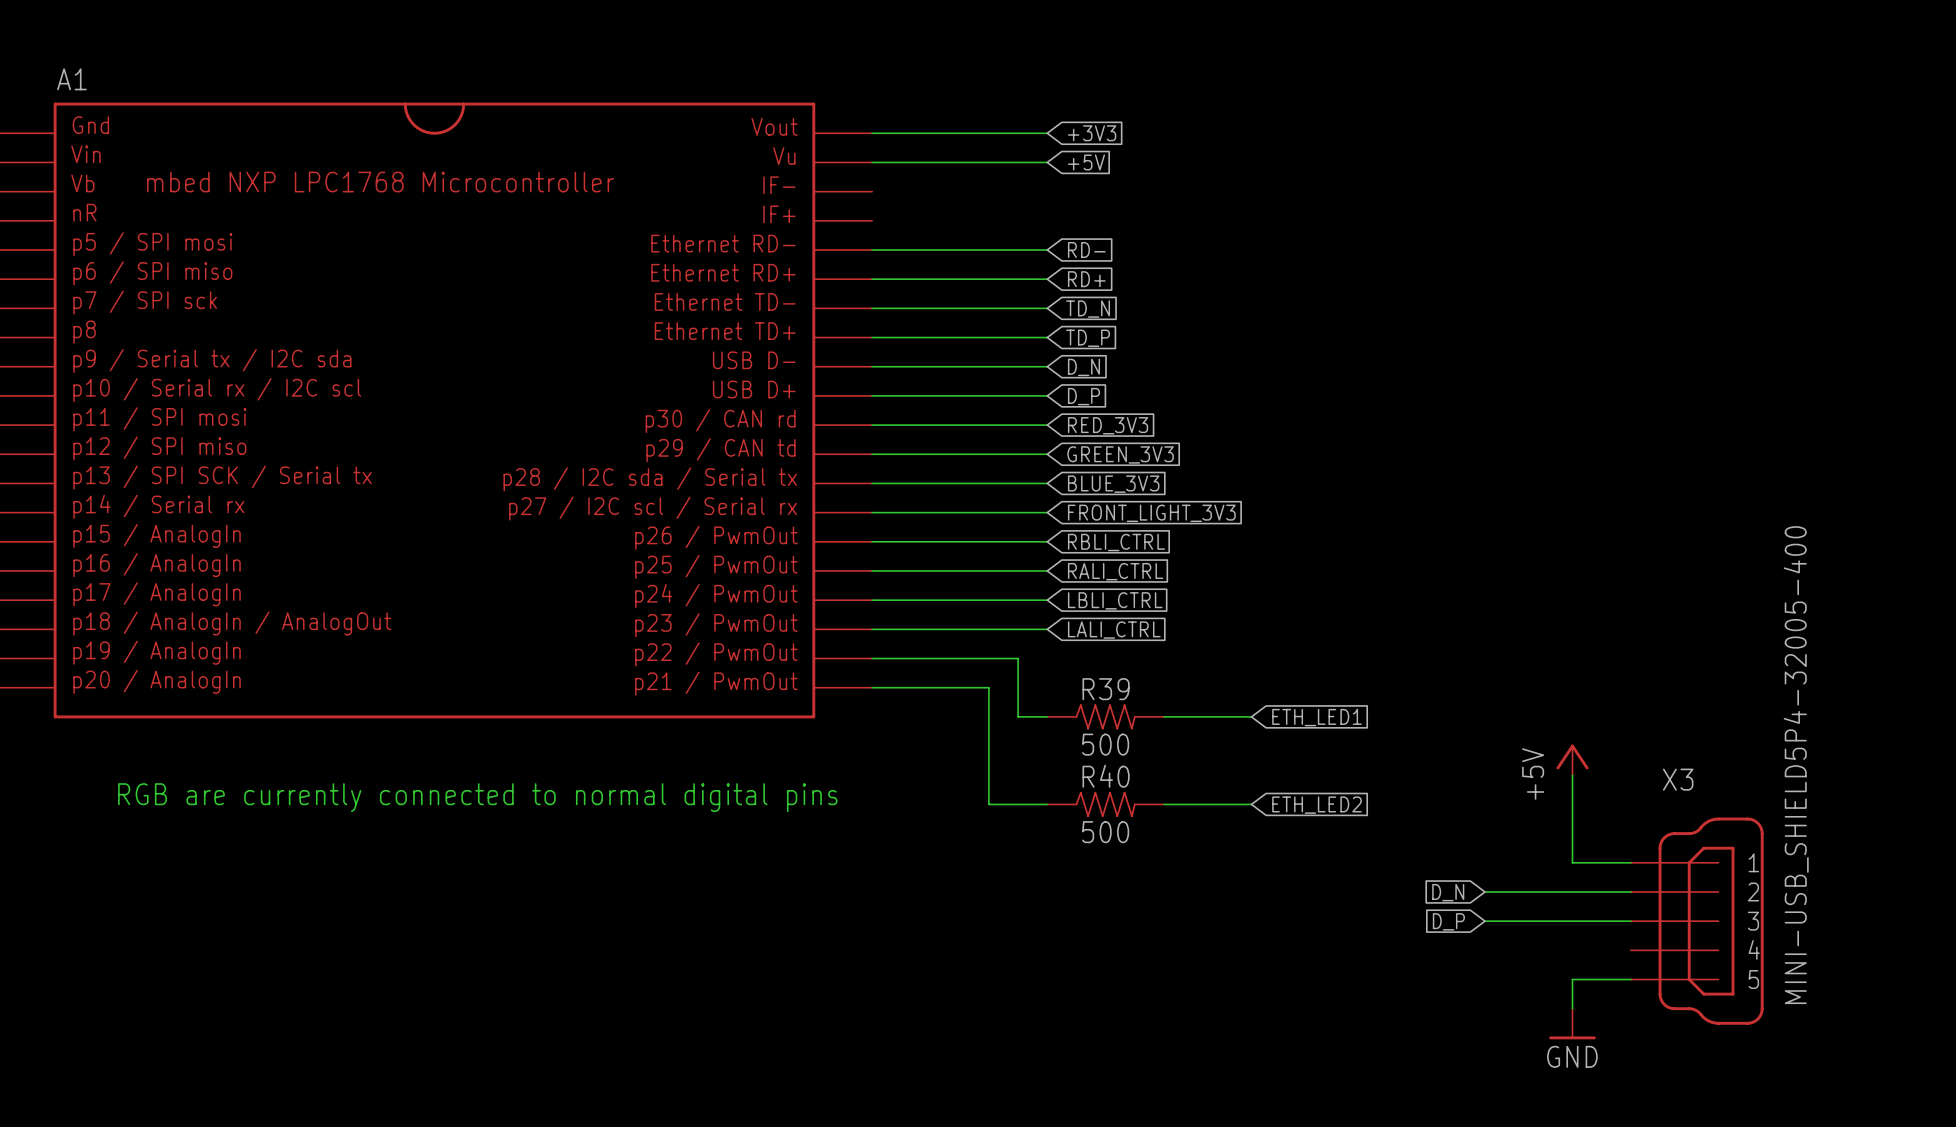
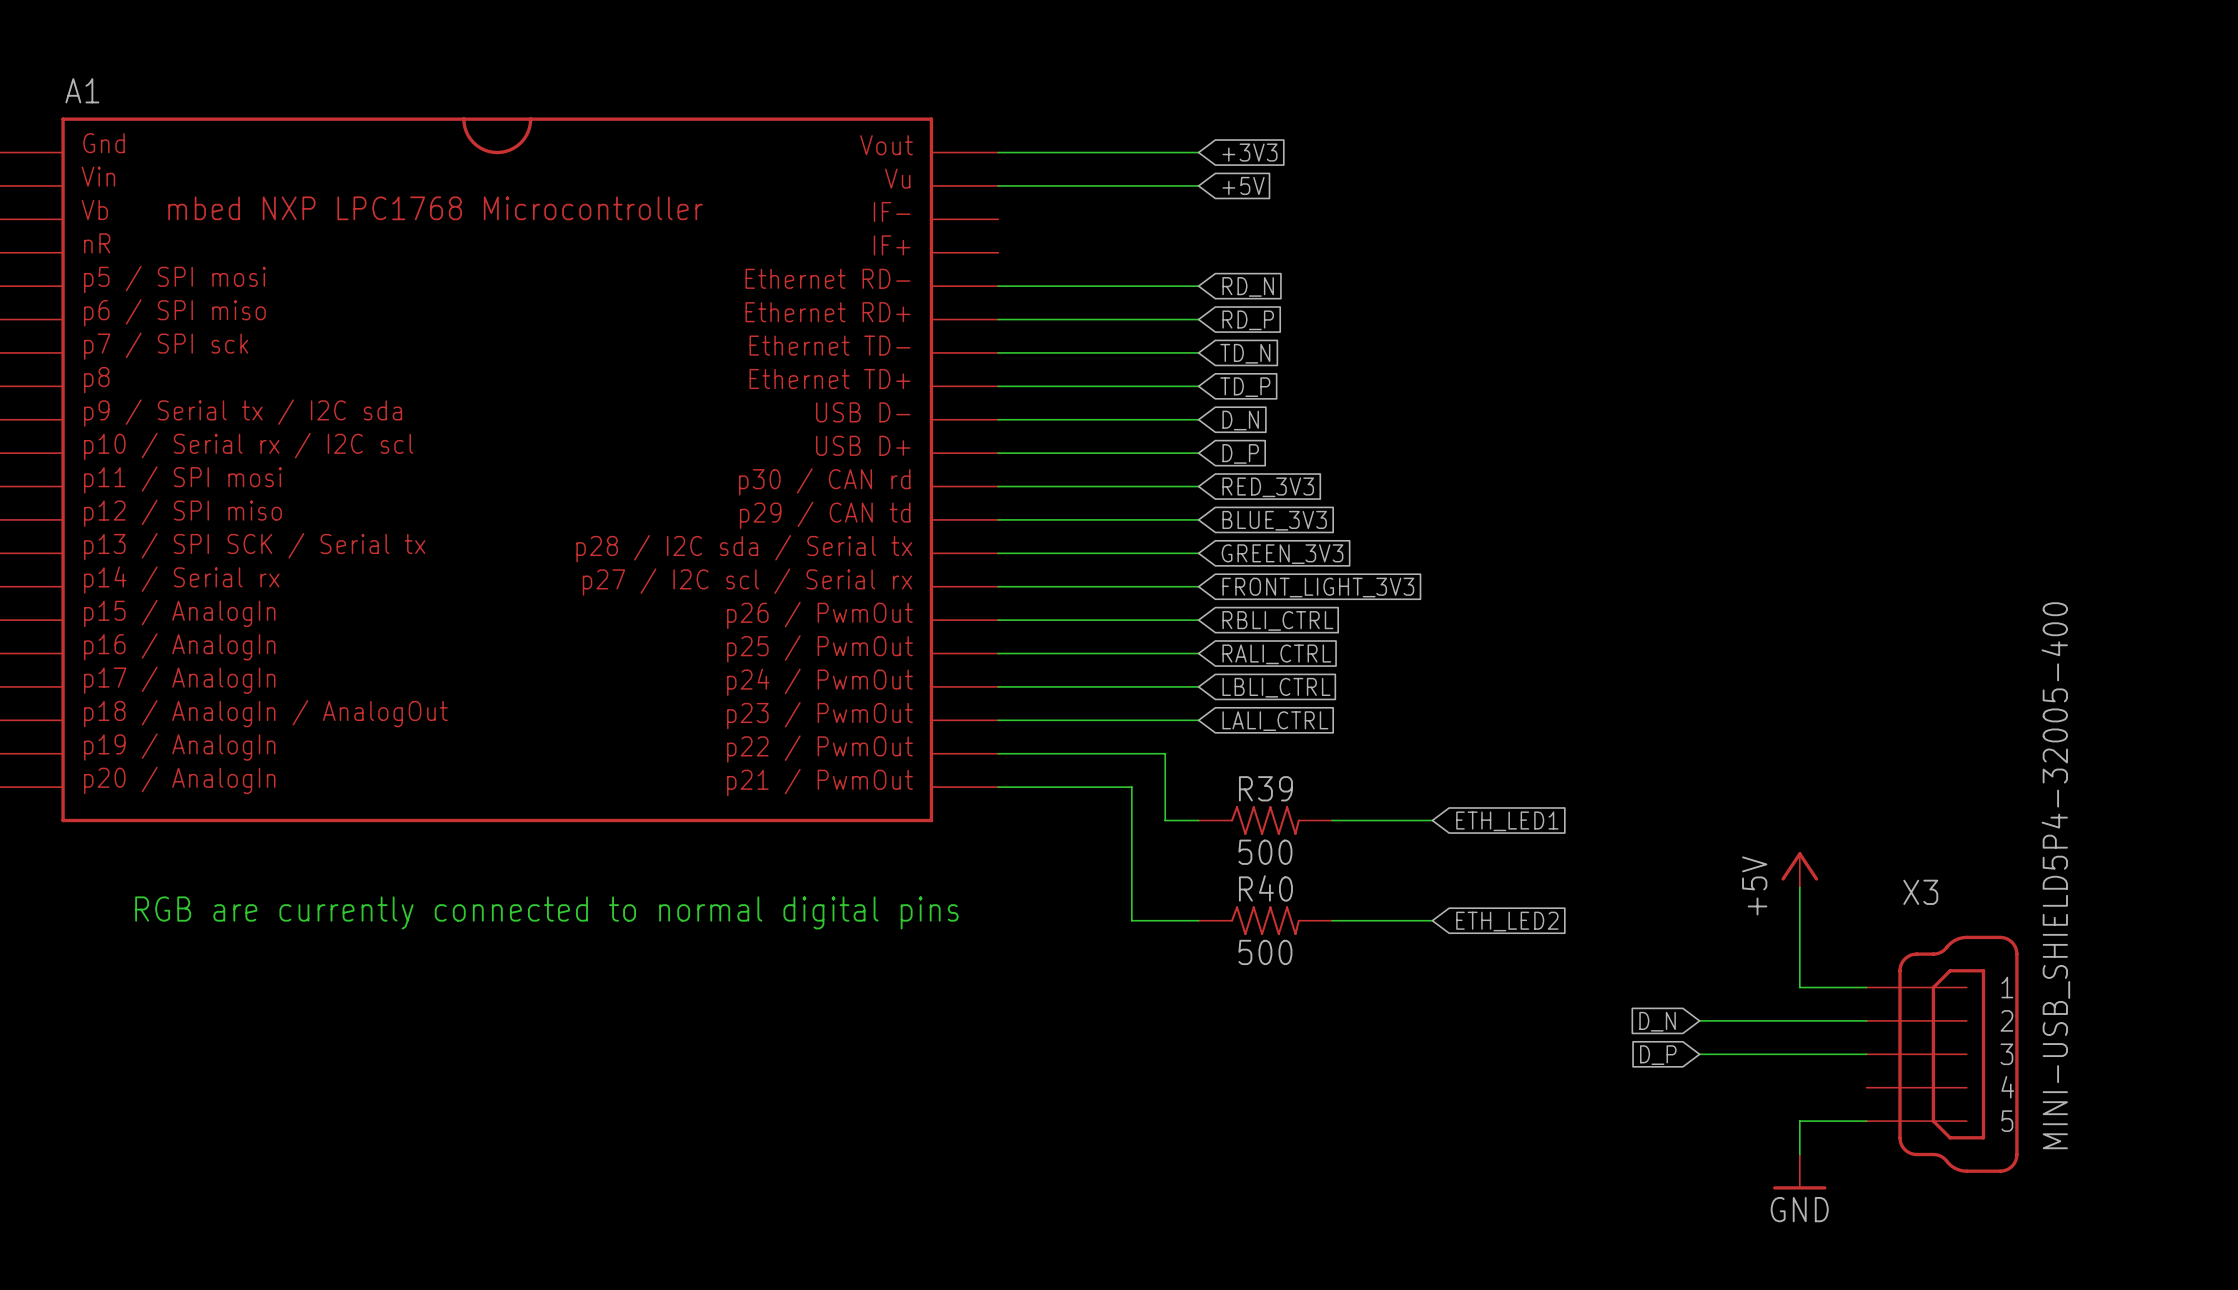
global label: RD- (1086, 250) -> RD_N (1248, 286)
global label: RD+ (1086, 279) -> RD_P (1248, 320)
global label: GREEN_3V3 (1120, 454) -> BLUE_3V3 (1274, 520)
global label: BLUE_3V3 (1113, 484) -> GREEN_3V3 (1282, 554)

